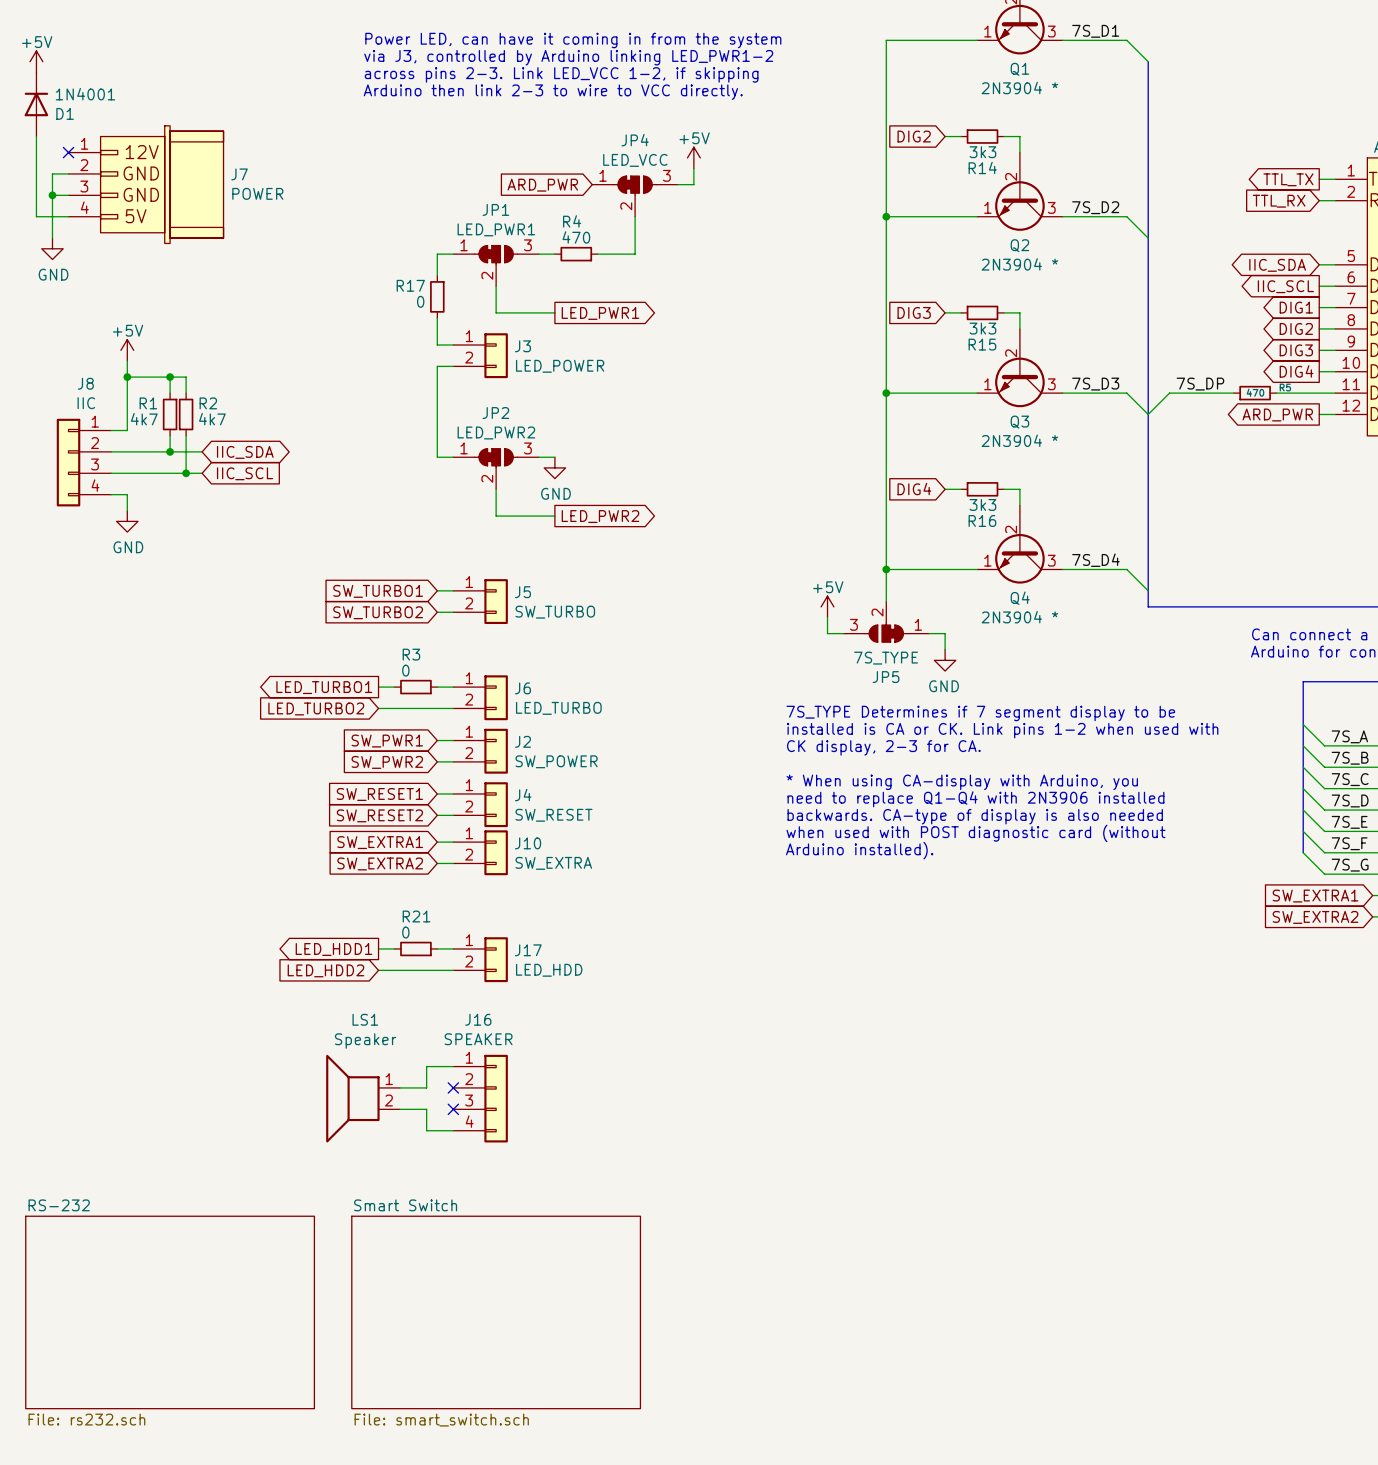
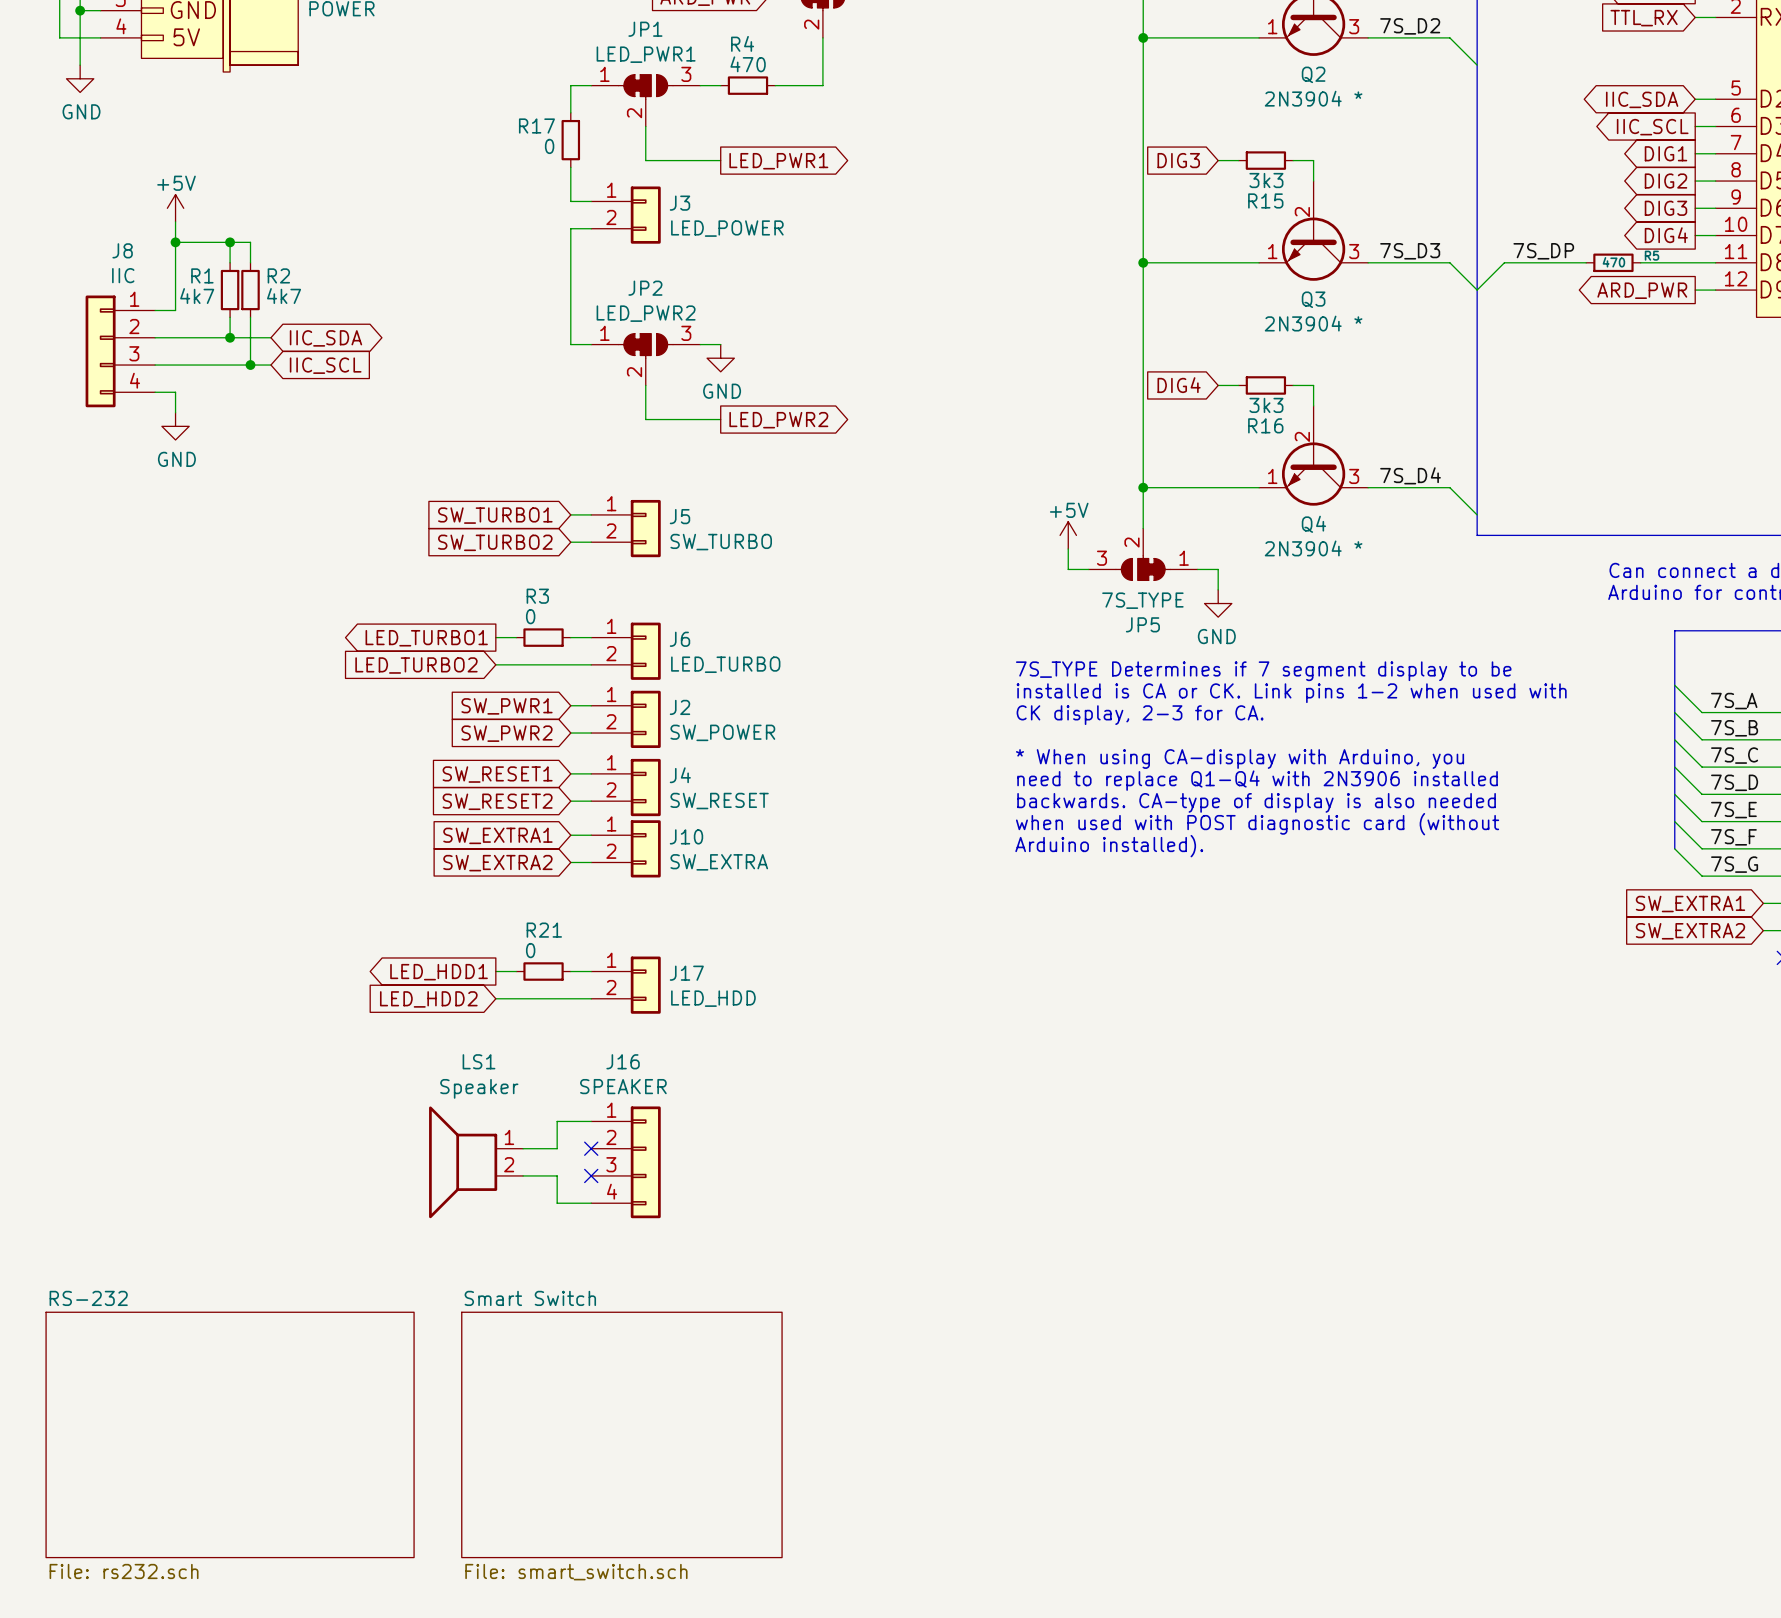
sheet Smart Switch: none -> File: smart_switch.sch (621, 1434)
sheet Smart Switch: File: smart_switch.sch (496, 1312) -> none

